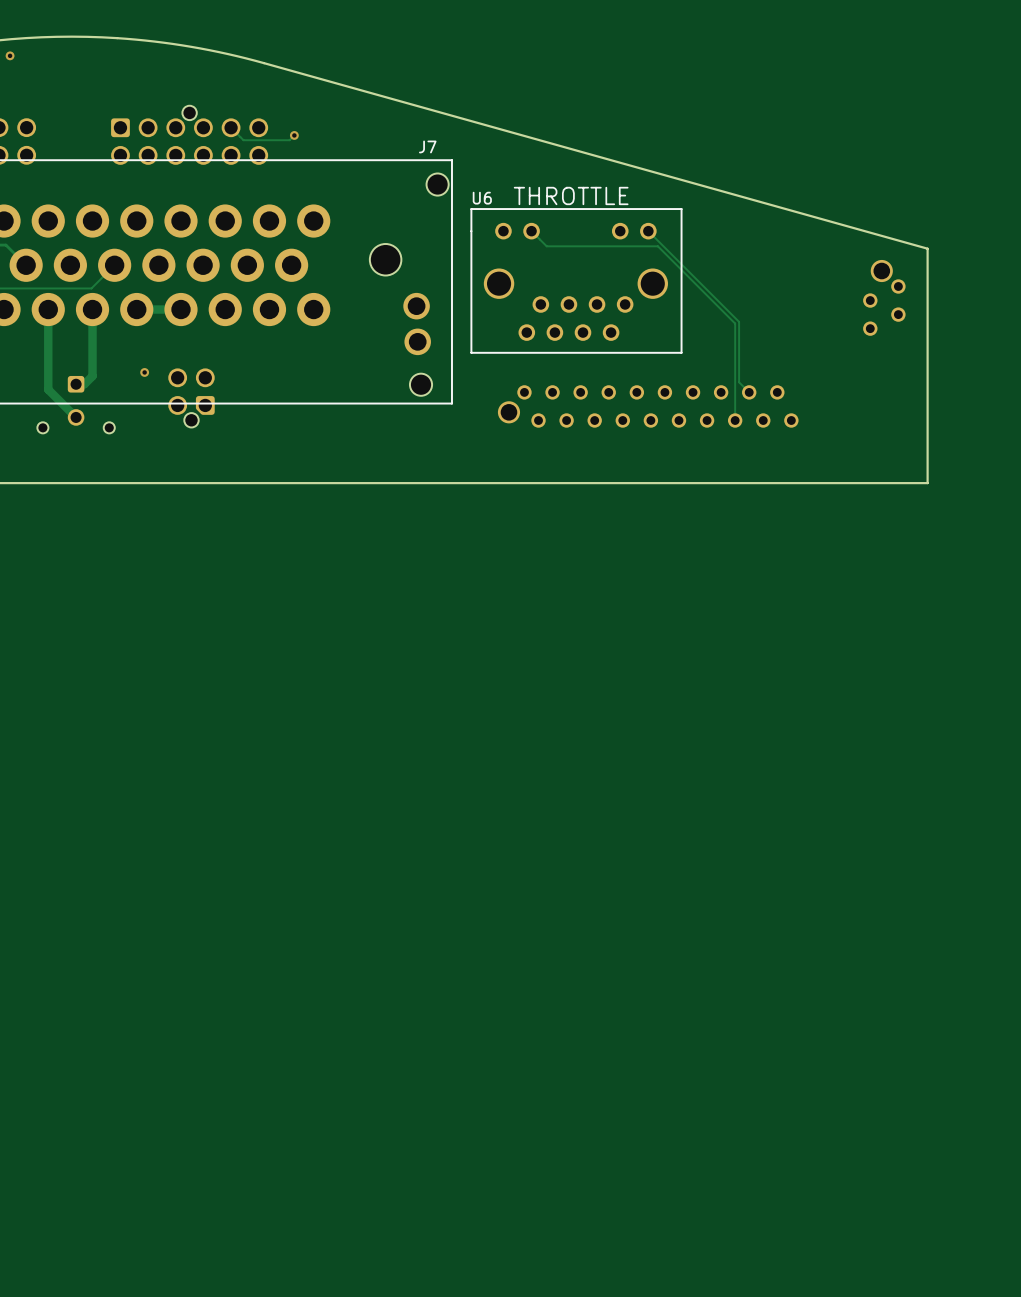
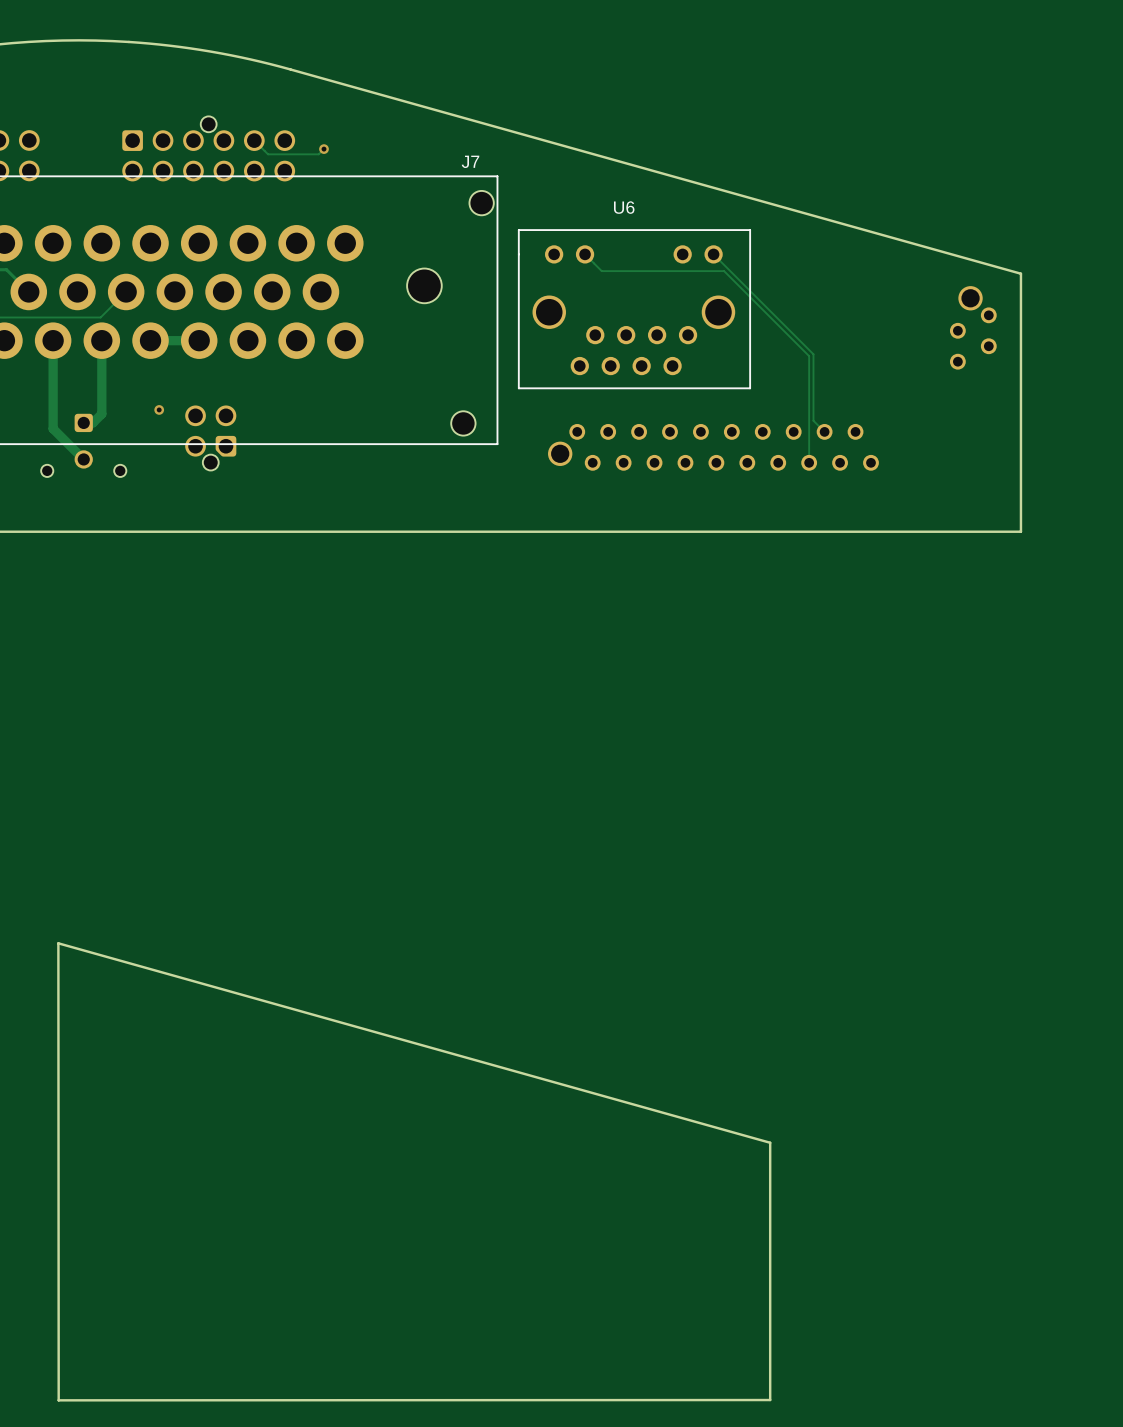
via: (10, 55) -> none
text: THROTTLE (571, 195) -> none
U6 name position: U6 (482, 198) -> U6 (624, 207)
part: (416, 306) -> none
part: (417, 341) -> none
board edge: none -> (58, 943) (58, 1400) (770, 1400) (770, 1142) (58, 943)

